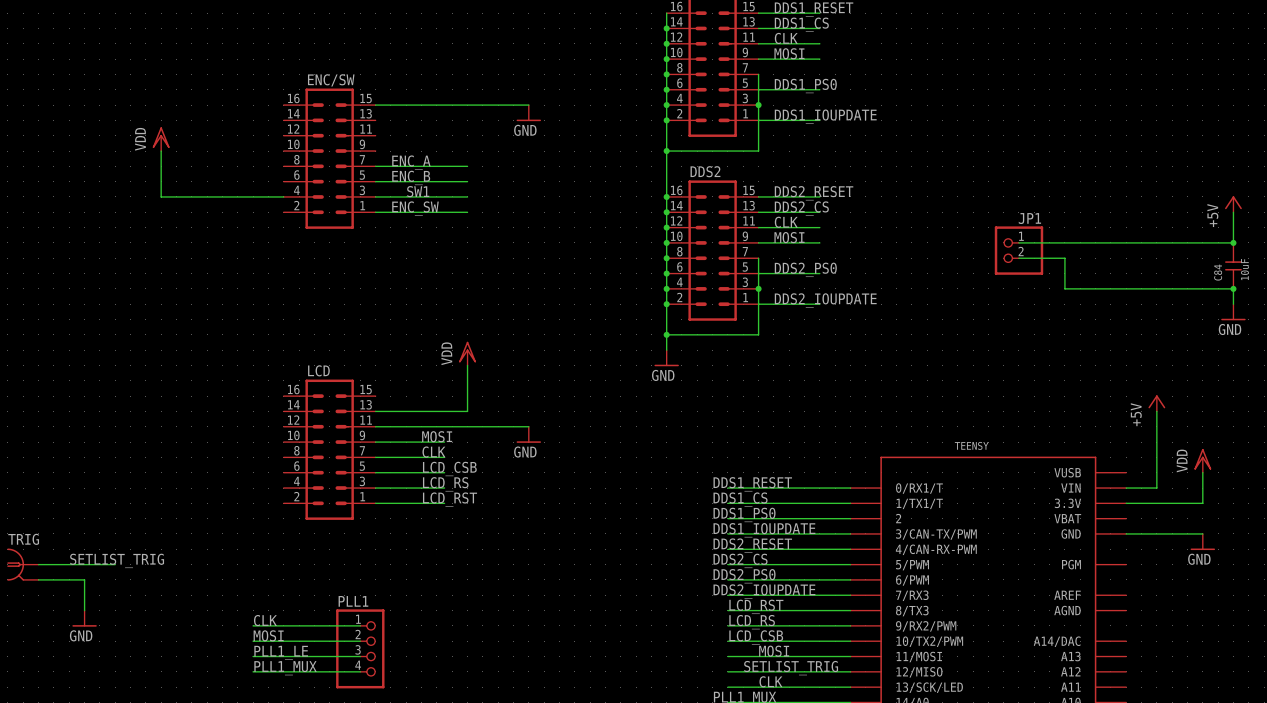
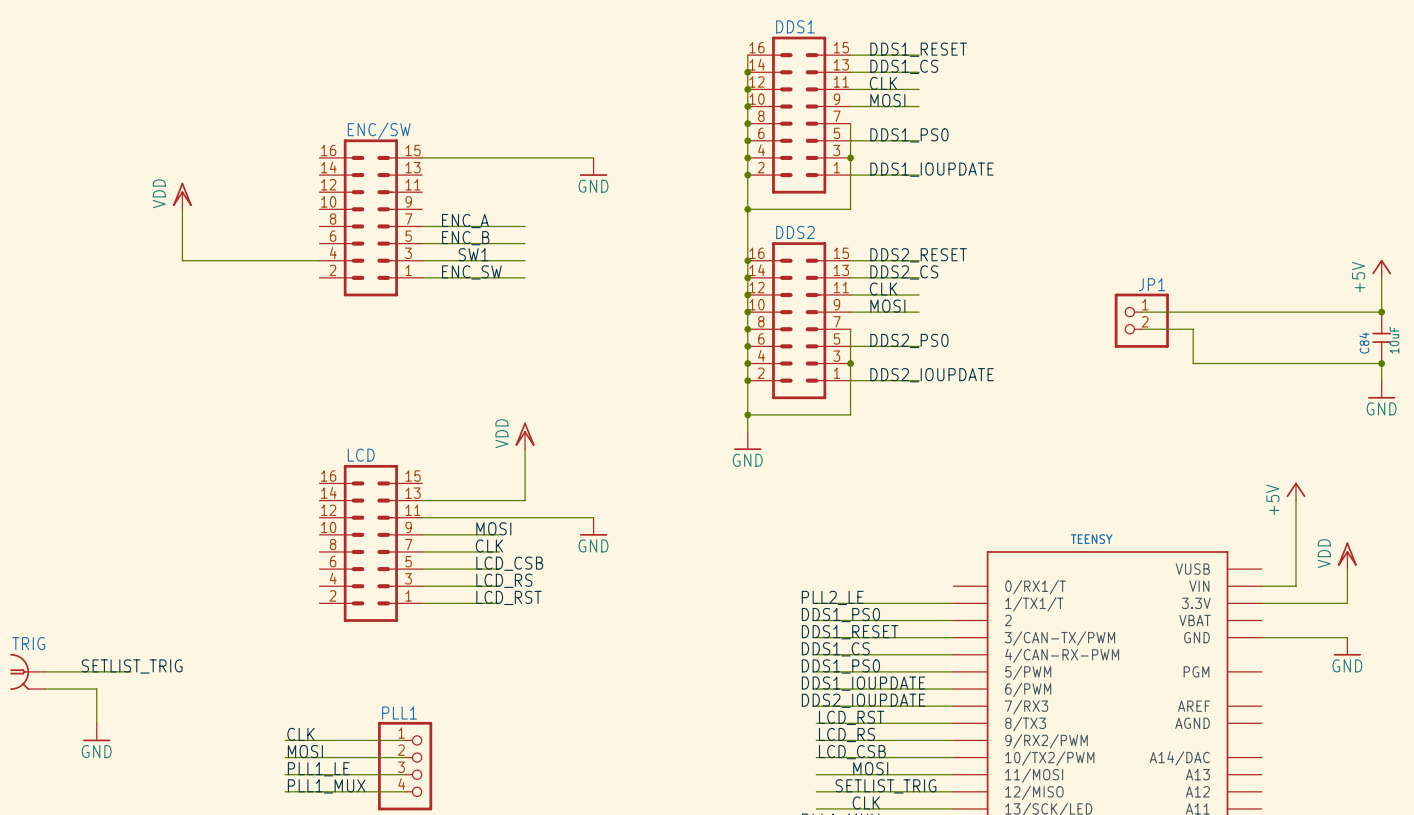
label: DDS1_RESET (752, 484) -> none
wire: (727, 488) (850, 488) -> none
label: DDS1_CS (740, 499) -> PLL2_LE (832, 597)
label: DDS1_IOUPDATE (764, 530) -> DDS1_RESET (850, 632)
label: DDS2_RESET (752, 545) -> DDS1_CS (835, 649)
label: DDS2_CS (740, 560) -> DDS1_PS0 (840, 666)
label: DDS2_PS0 (744, 576) -> DDS1_IOUPDATE (863, 683)

